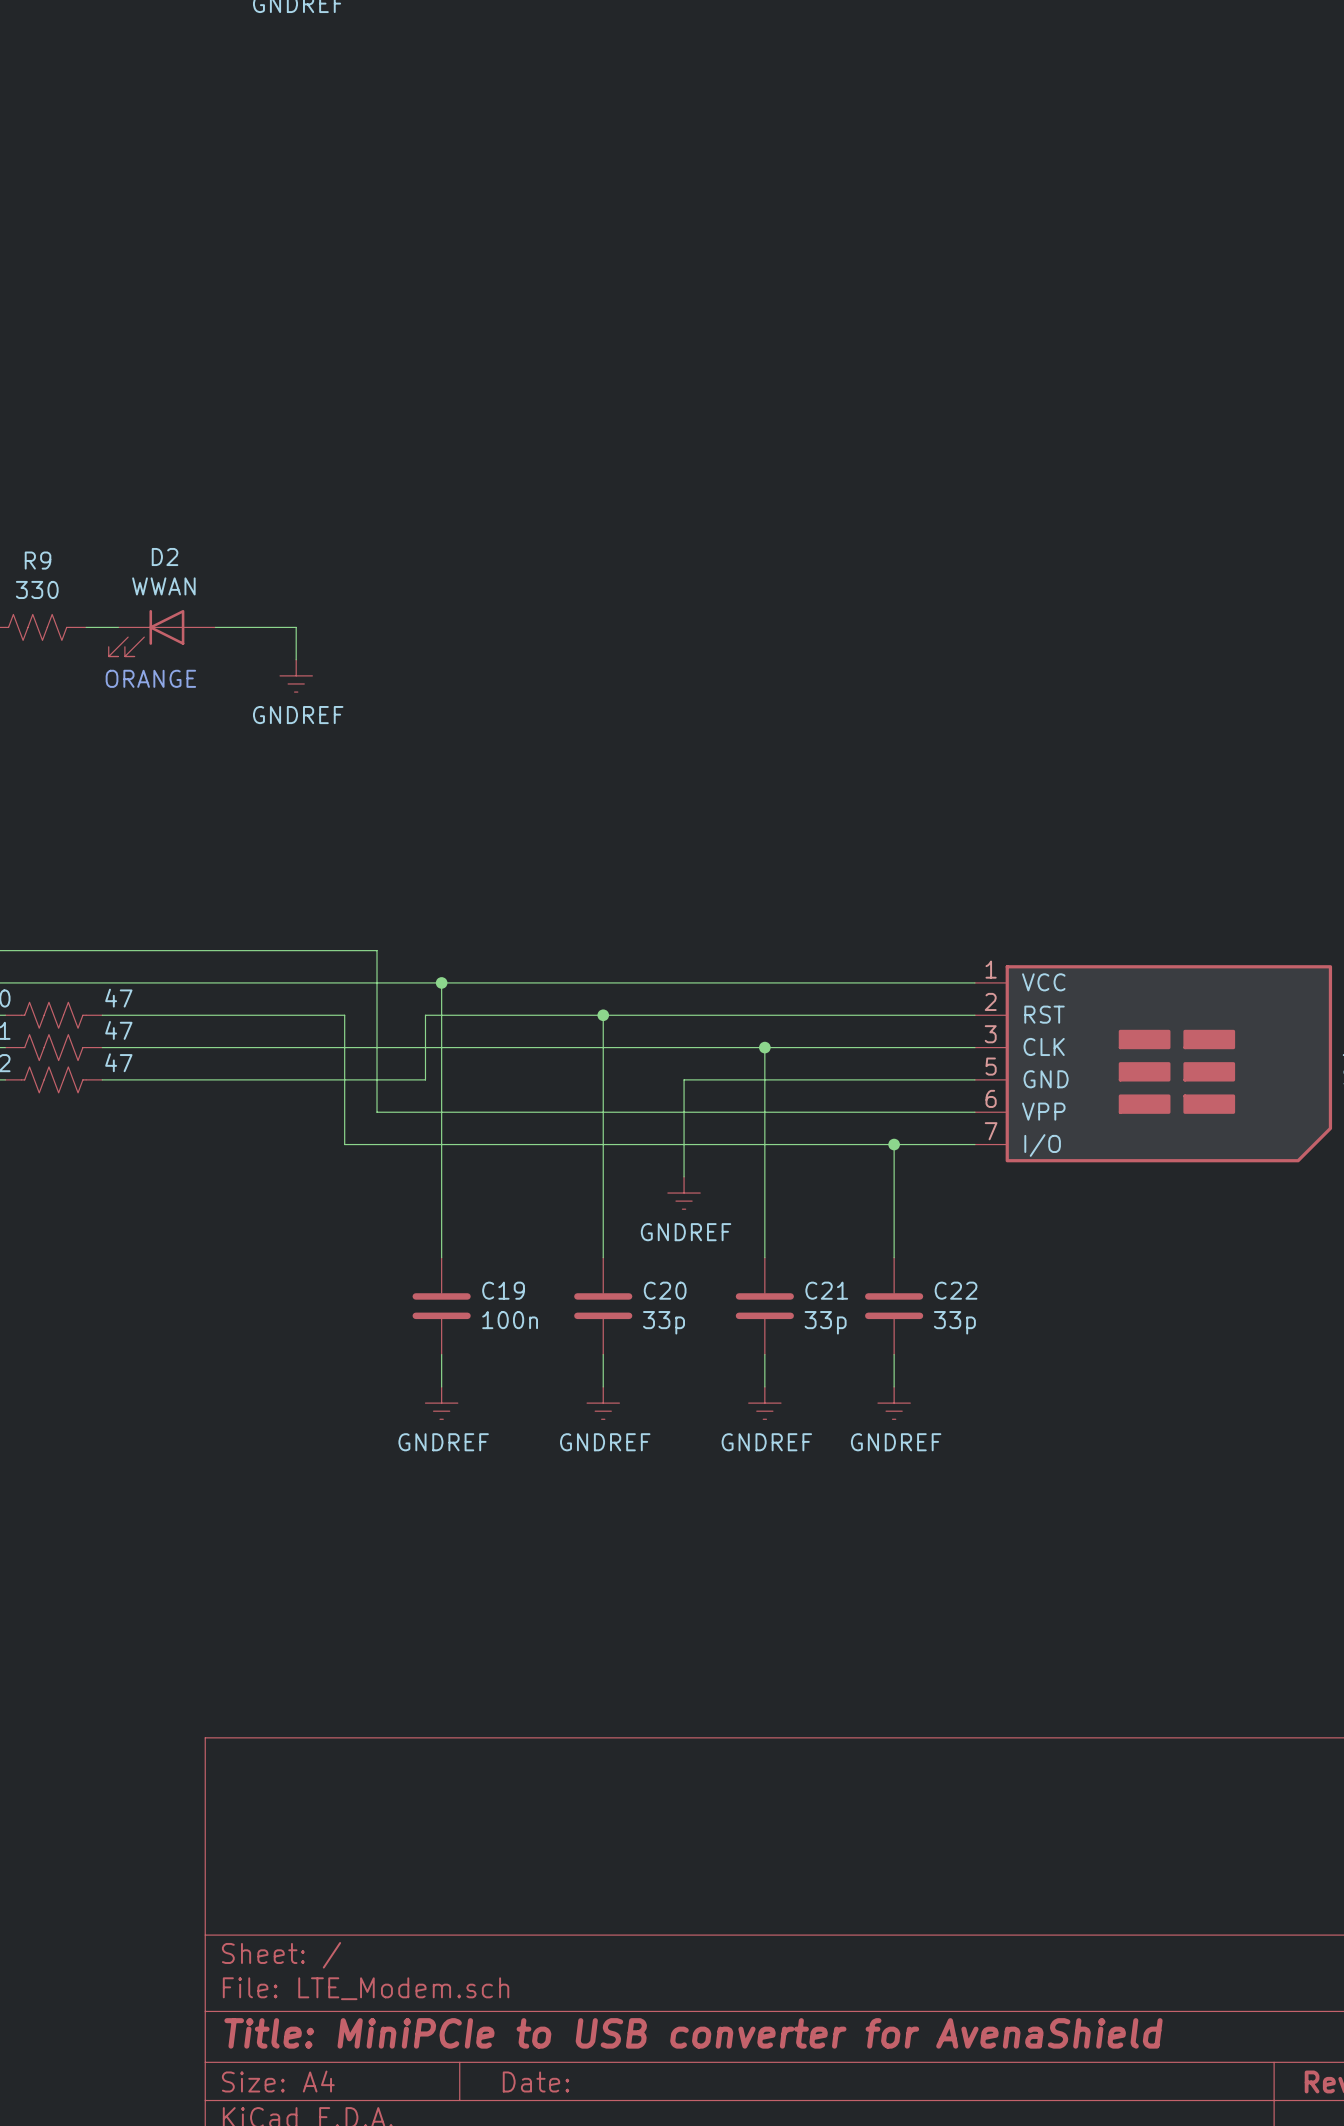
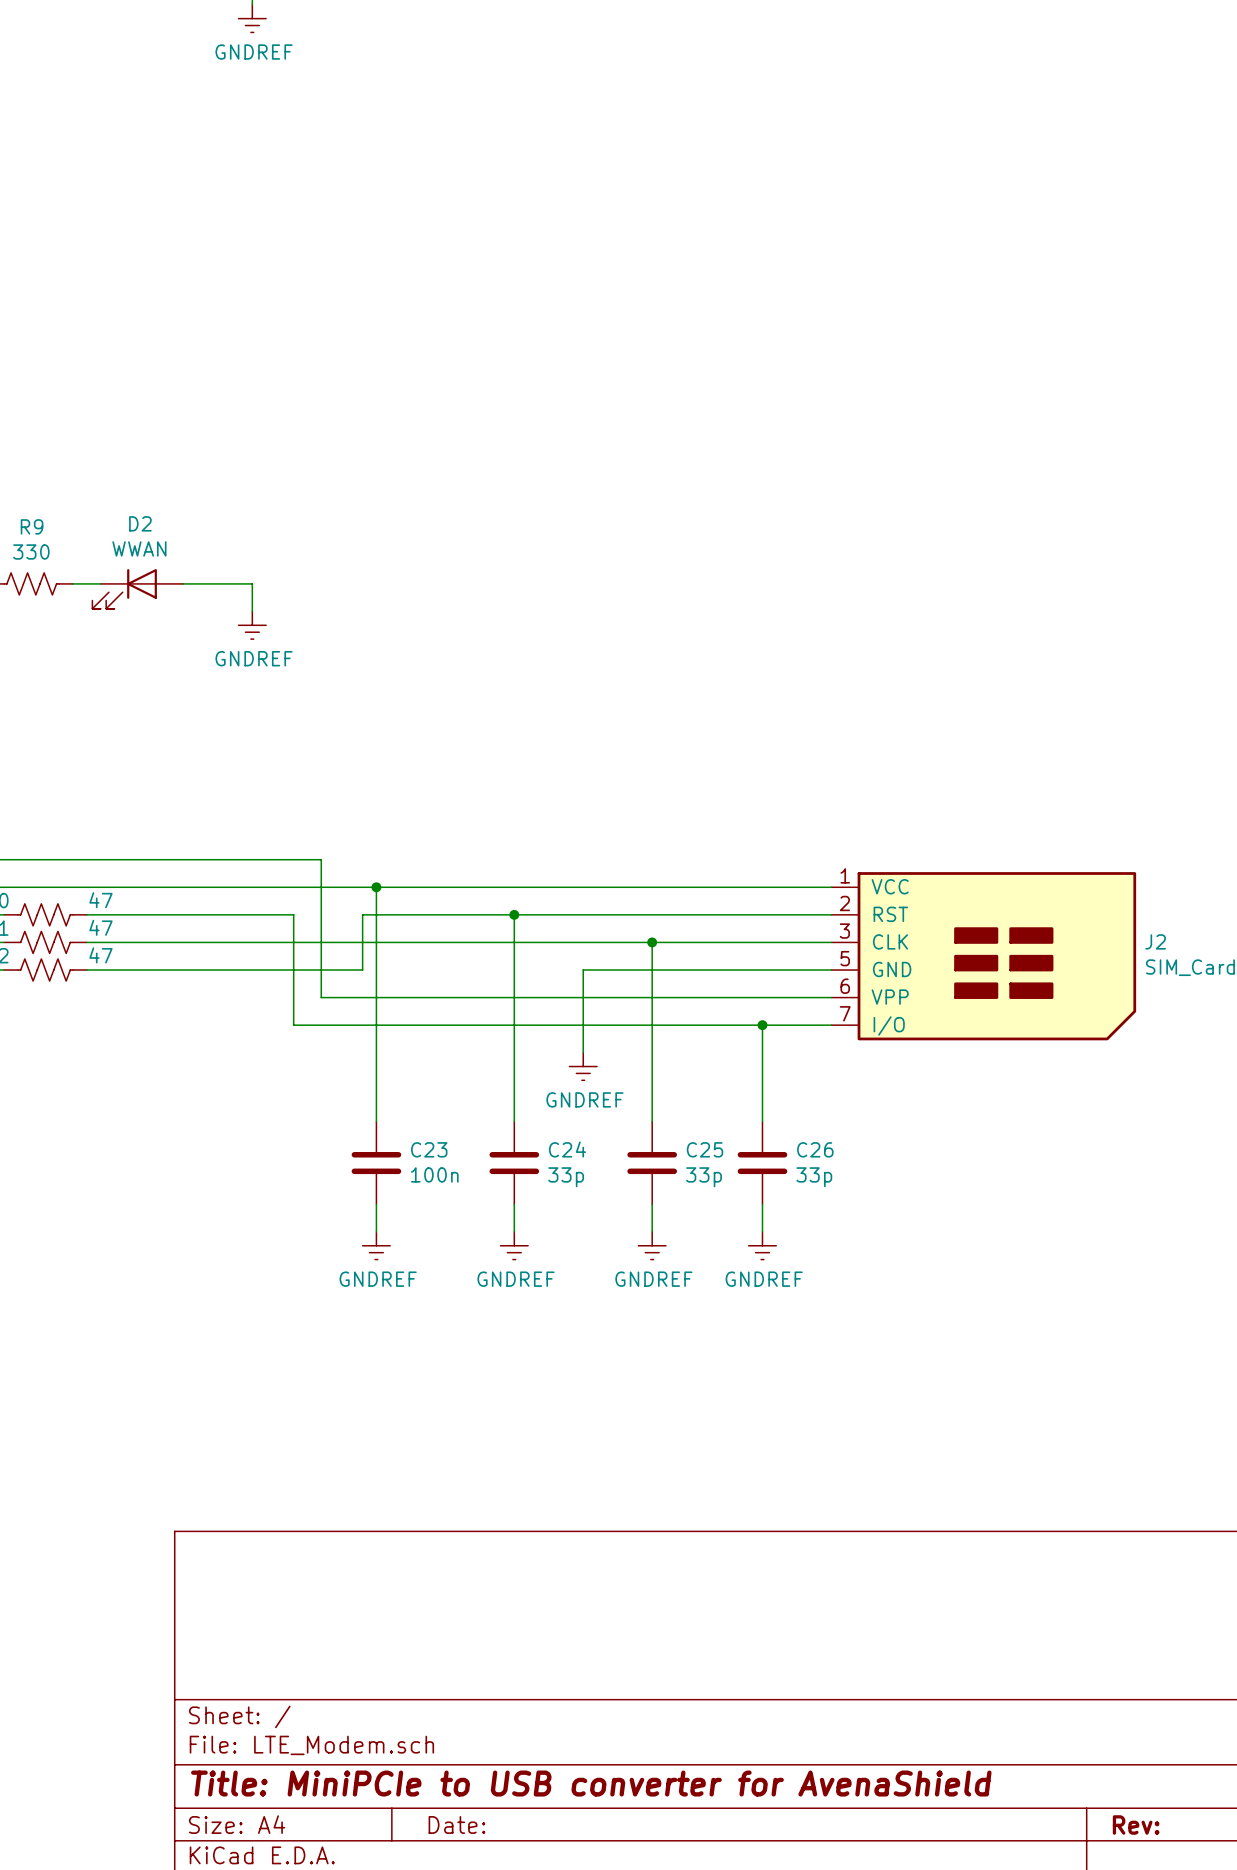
text: ORANGE (150, 678) -> none
C19 name: C19 (503, 1290) -> C23 (429, 1149)
C20 name: C20 (665, 1290) -> C24 (567, 1149)
C21 name: C21 (826, 1290) -> C25 (705, 1149)
C22 name: C22 (956, 1290) -> C26 (815, 1149)

